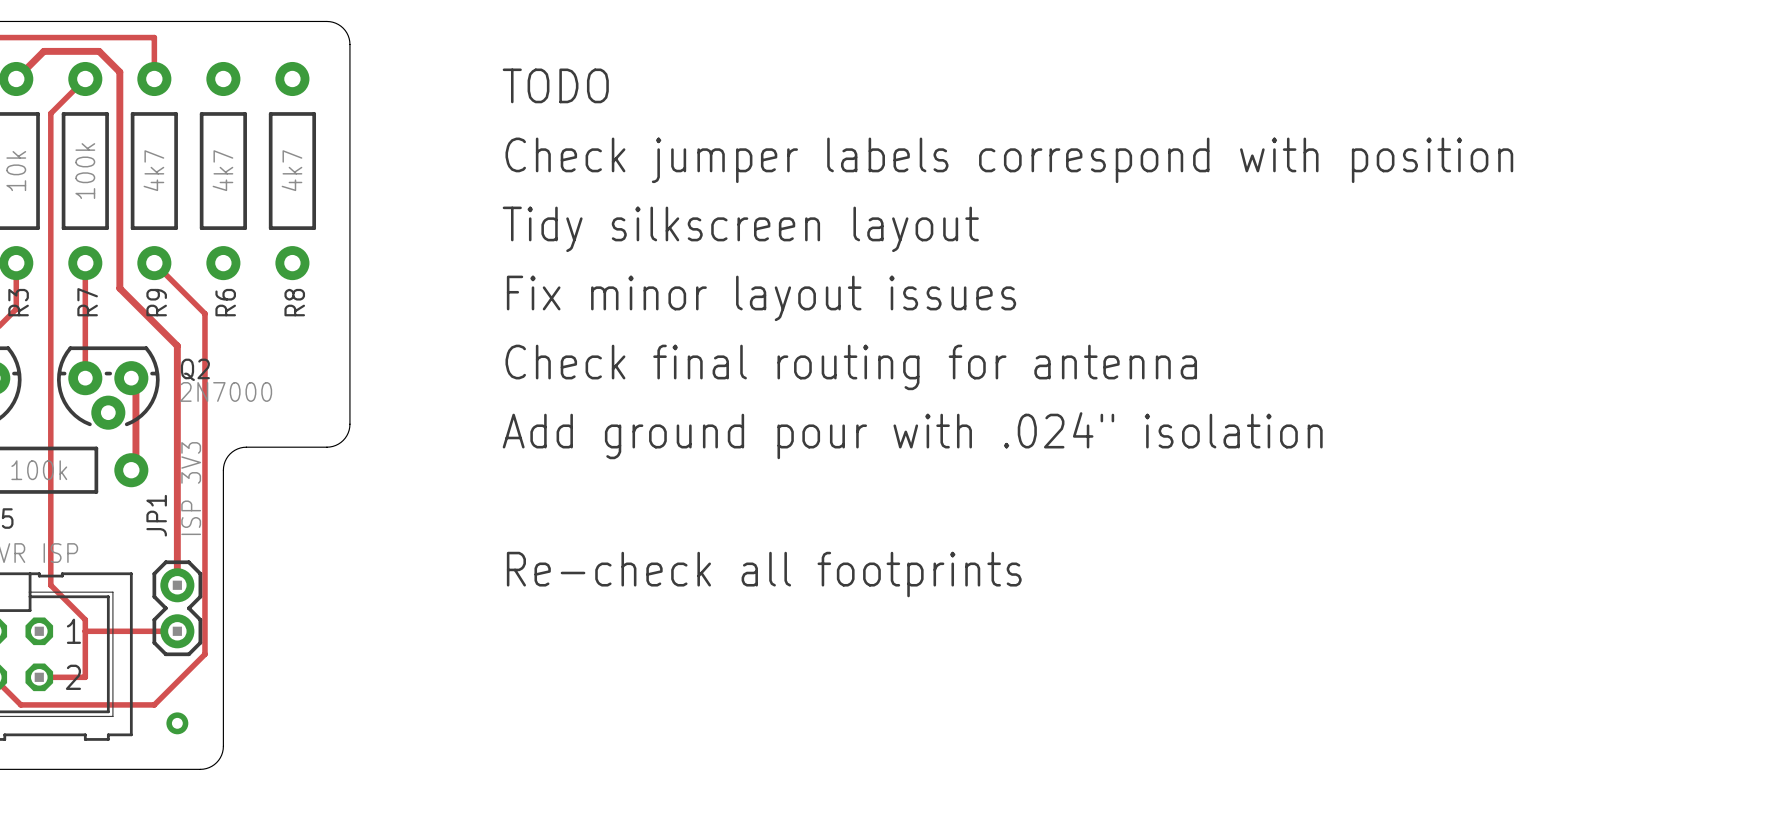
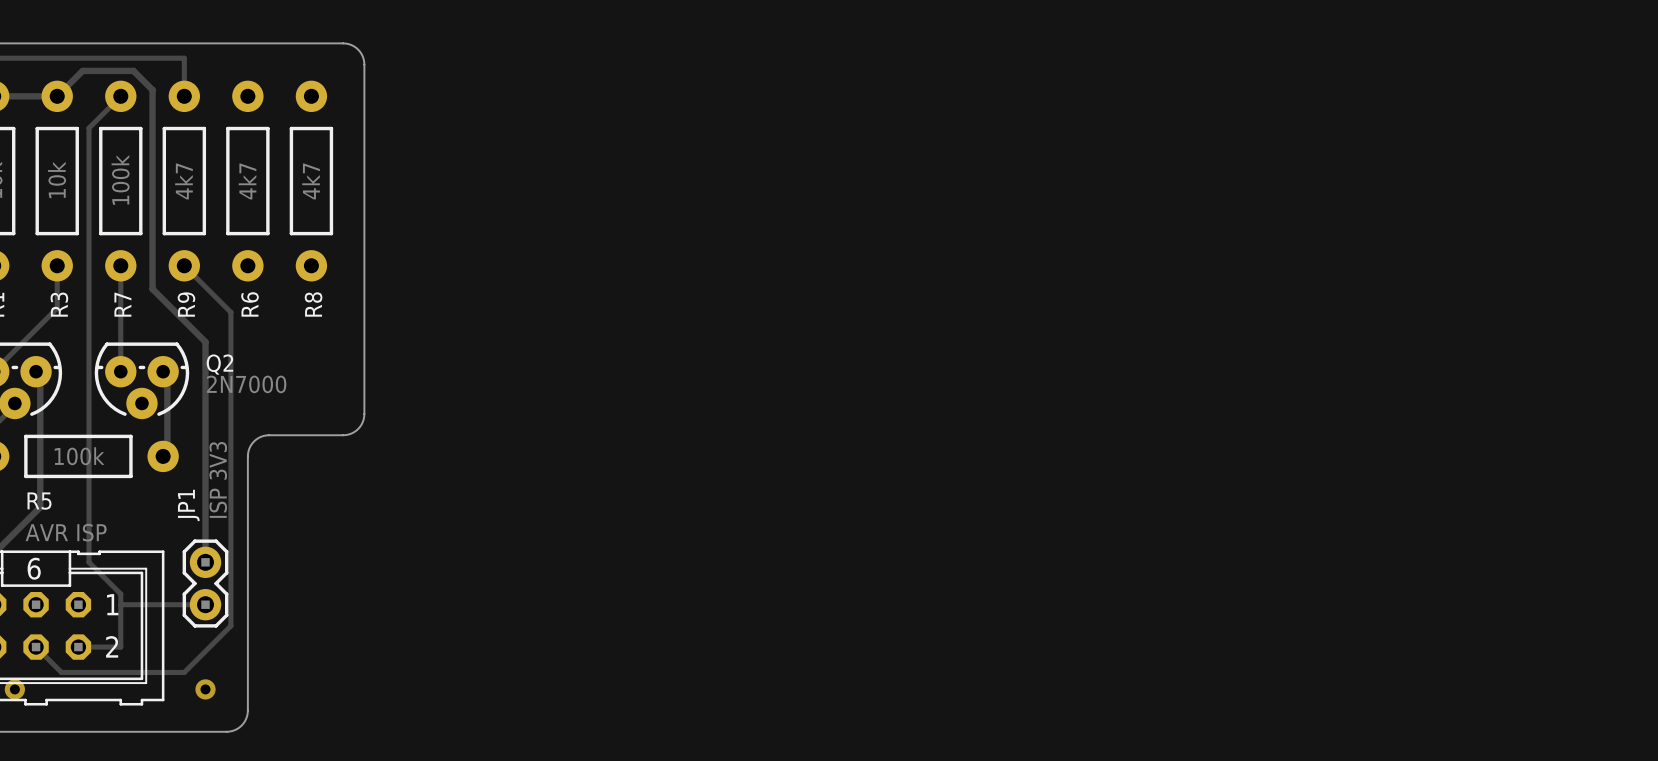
text: TODO (555, 85) -> none
text: Check jumper labels correspond with position (1009, 160) -> none
text: Tidy silkscreen layout (740, 229) -> none
text: Fix minor layout issues (761, 298) -> none
text: Check final routing for antenna (851, 367) -> none
text: Add ground pour with .024" isolation (912, 435) -> none
text: Re-check all footprints (764, 574) -> none

